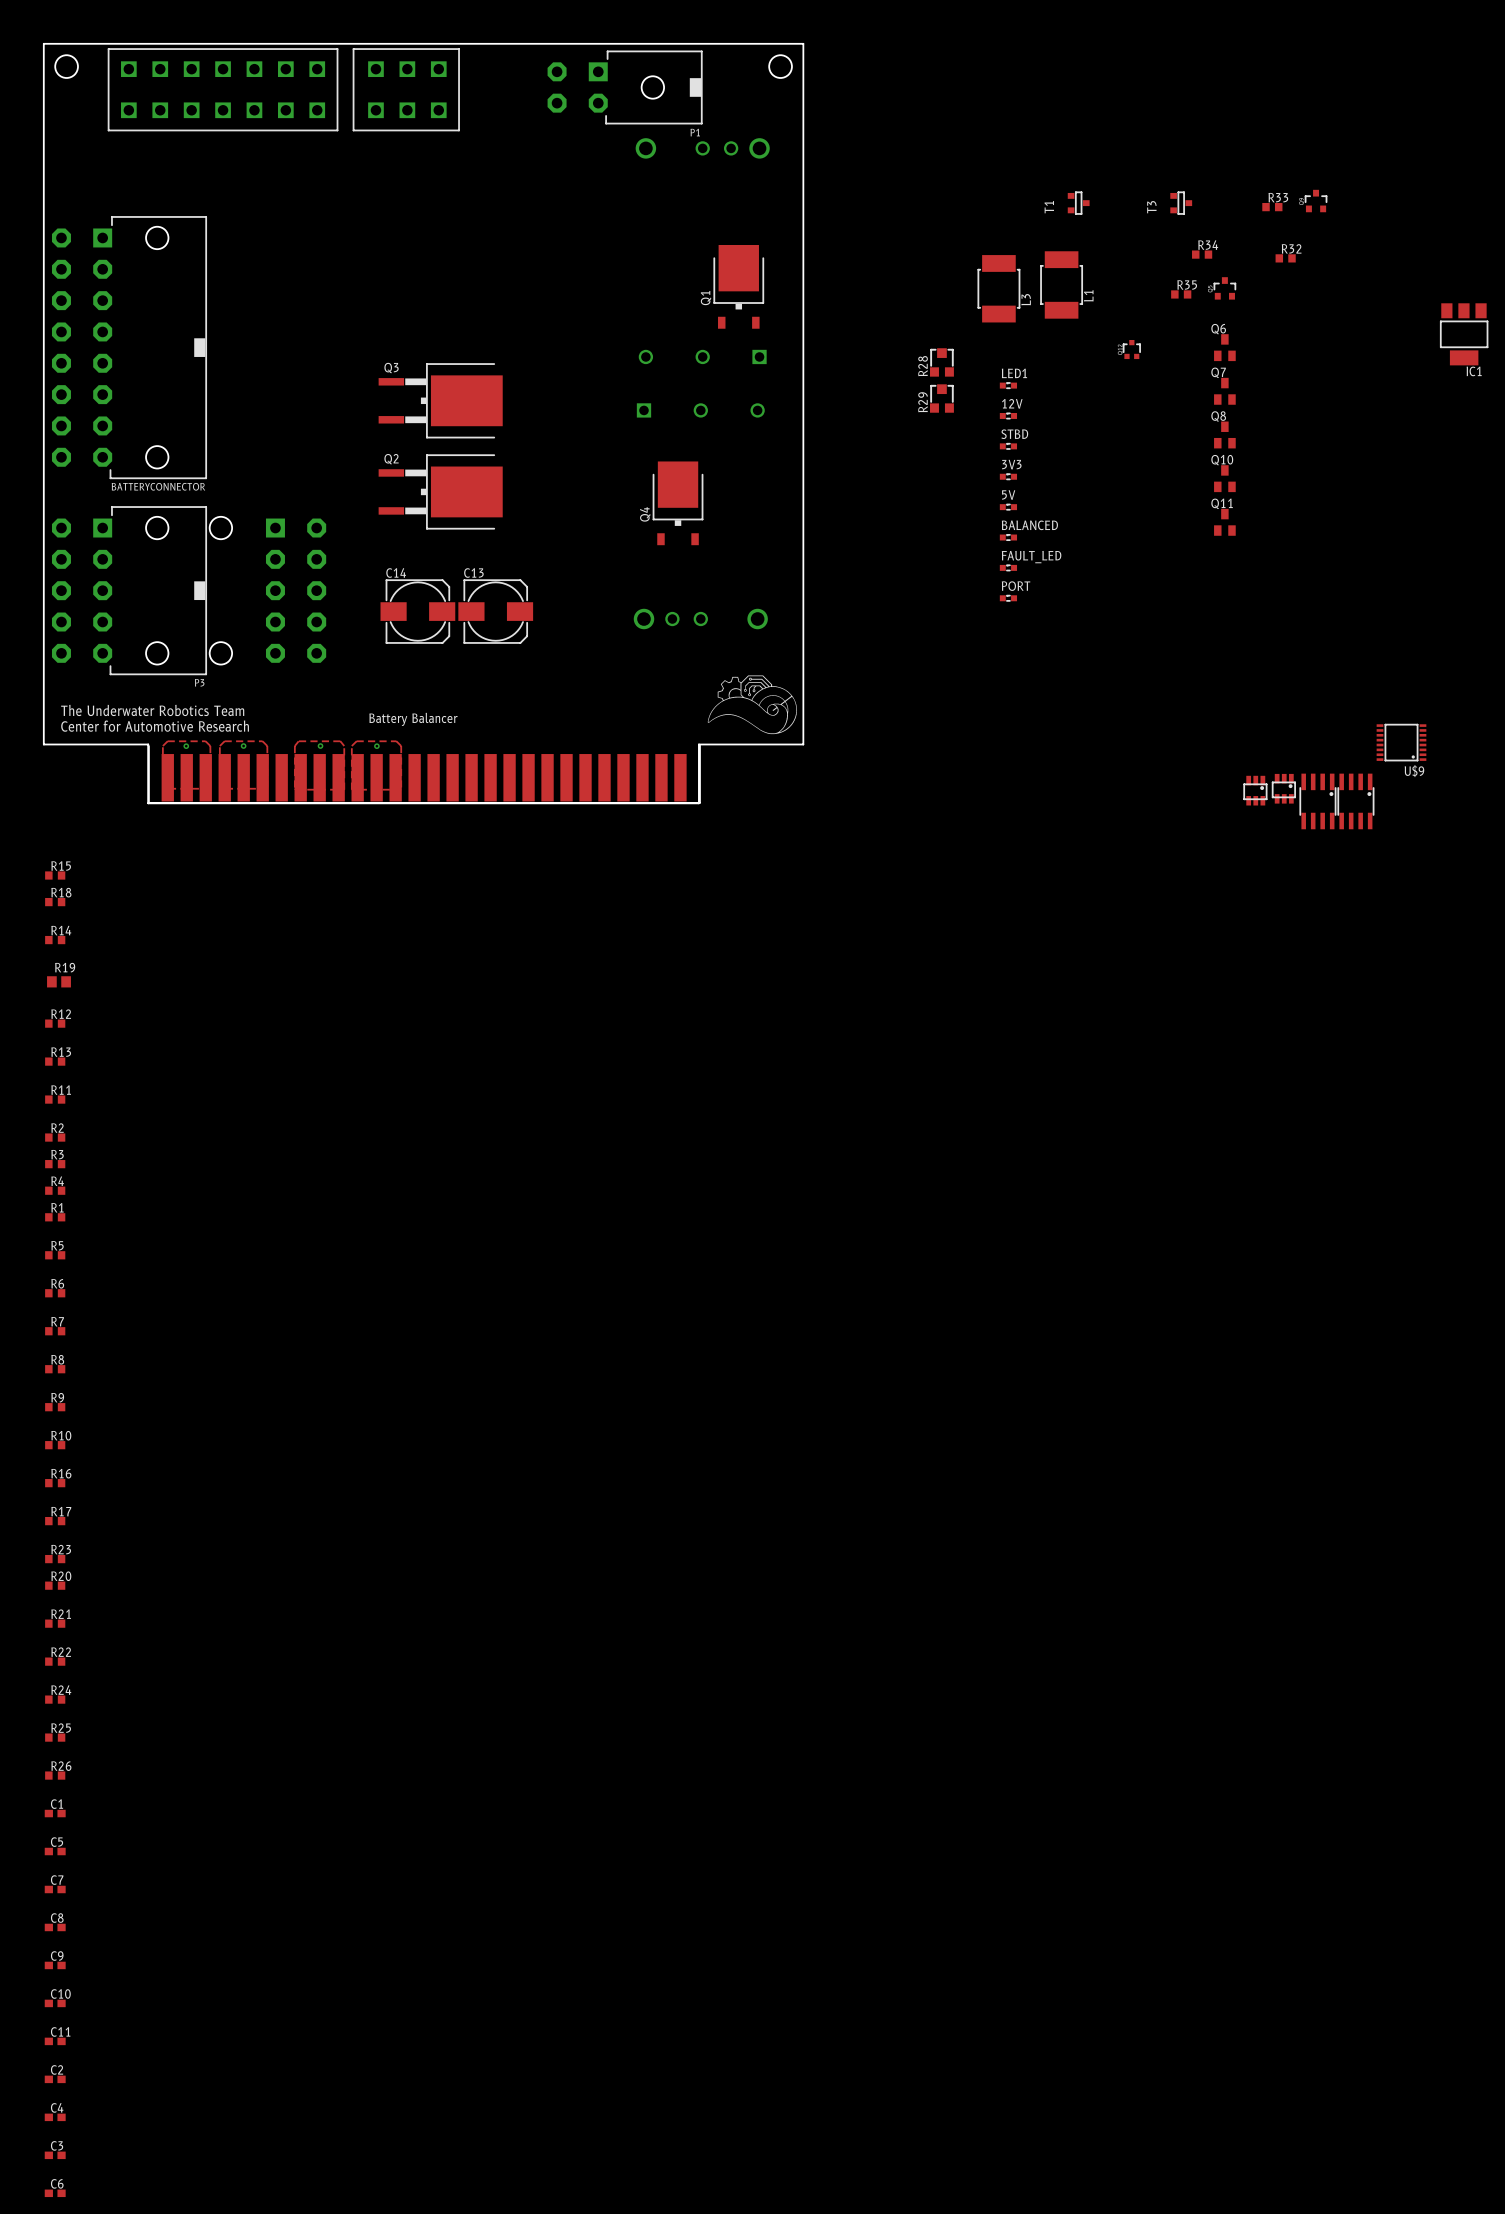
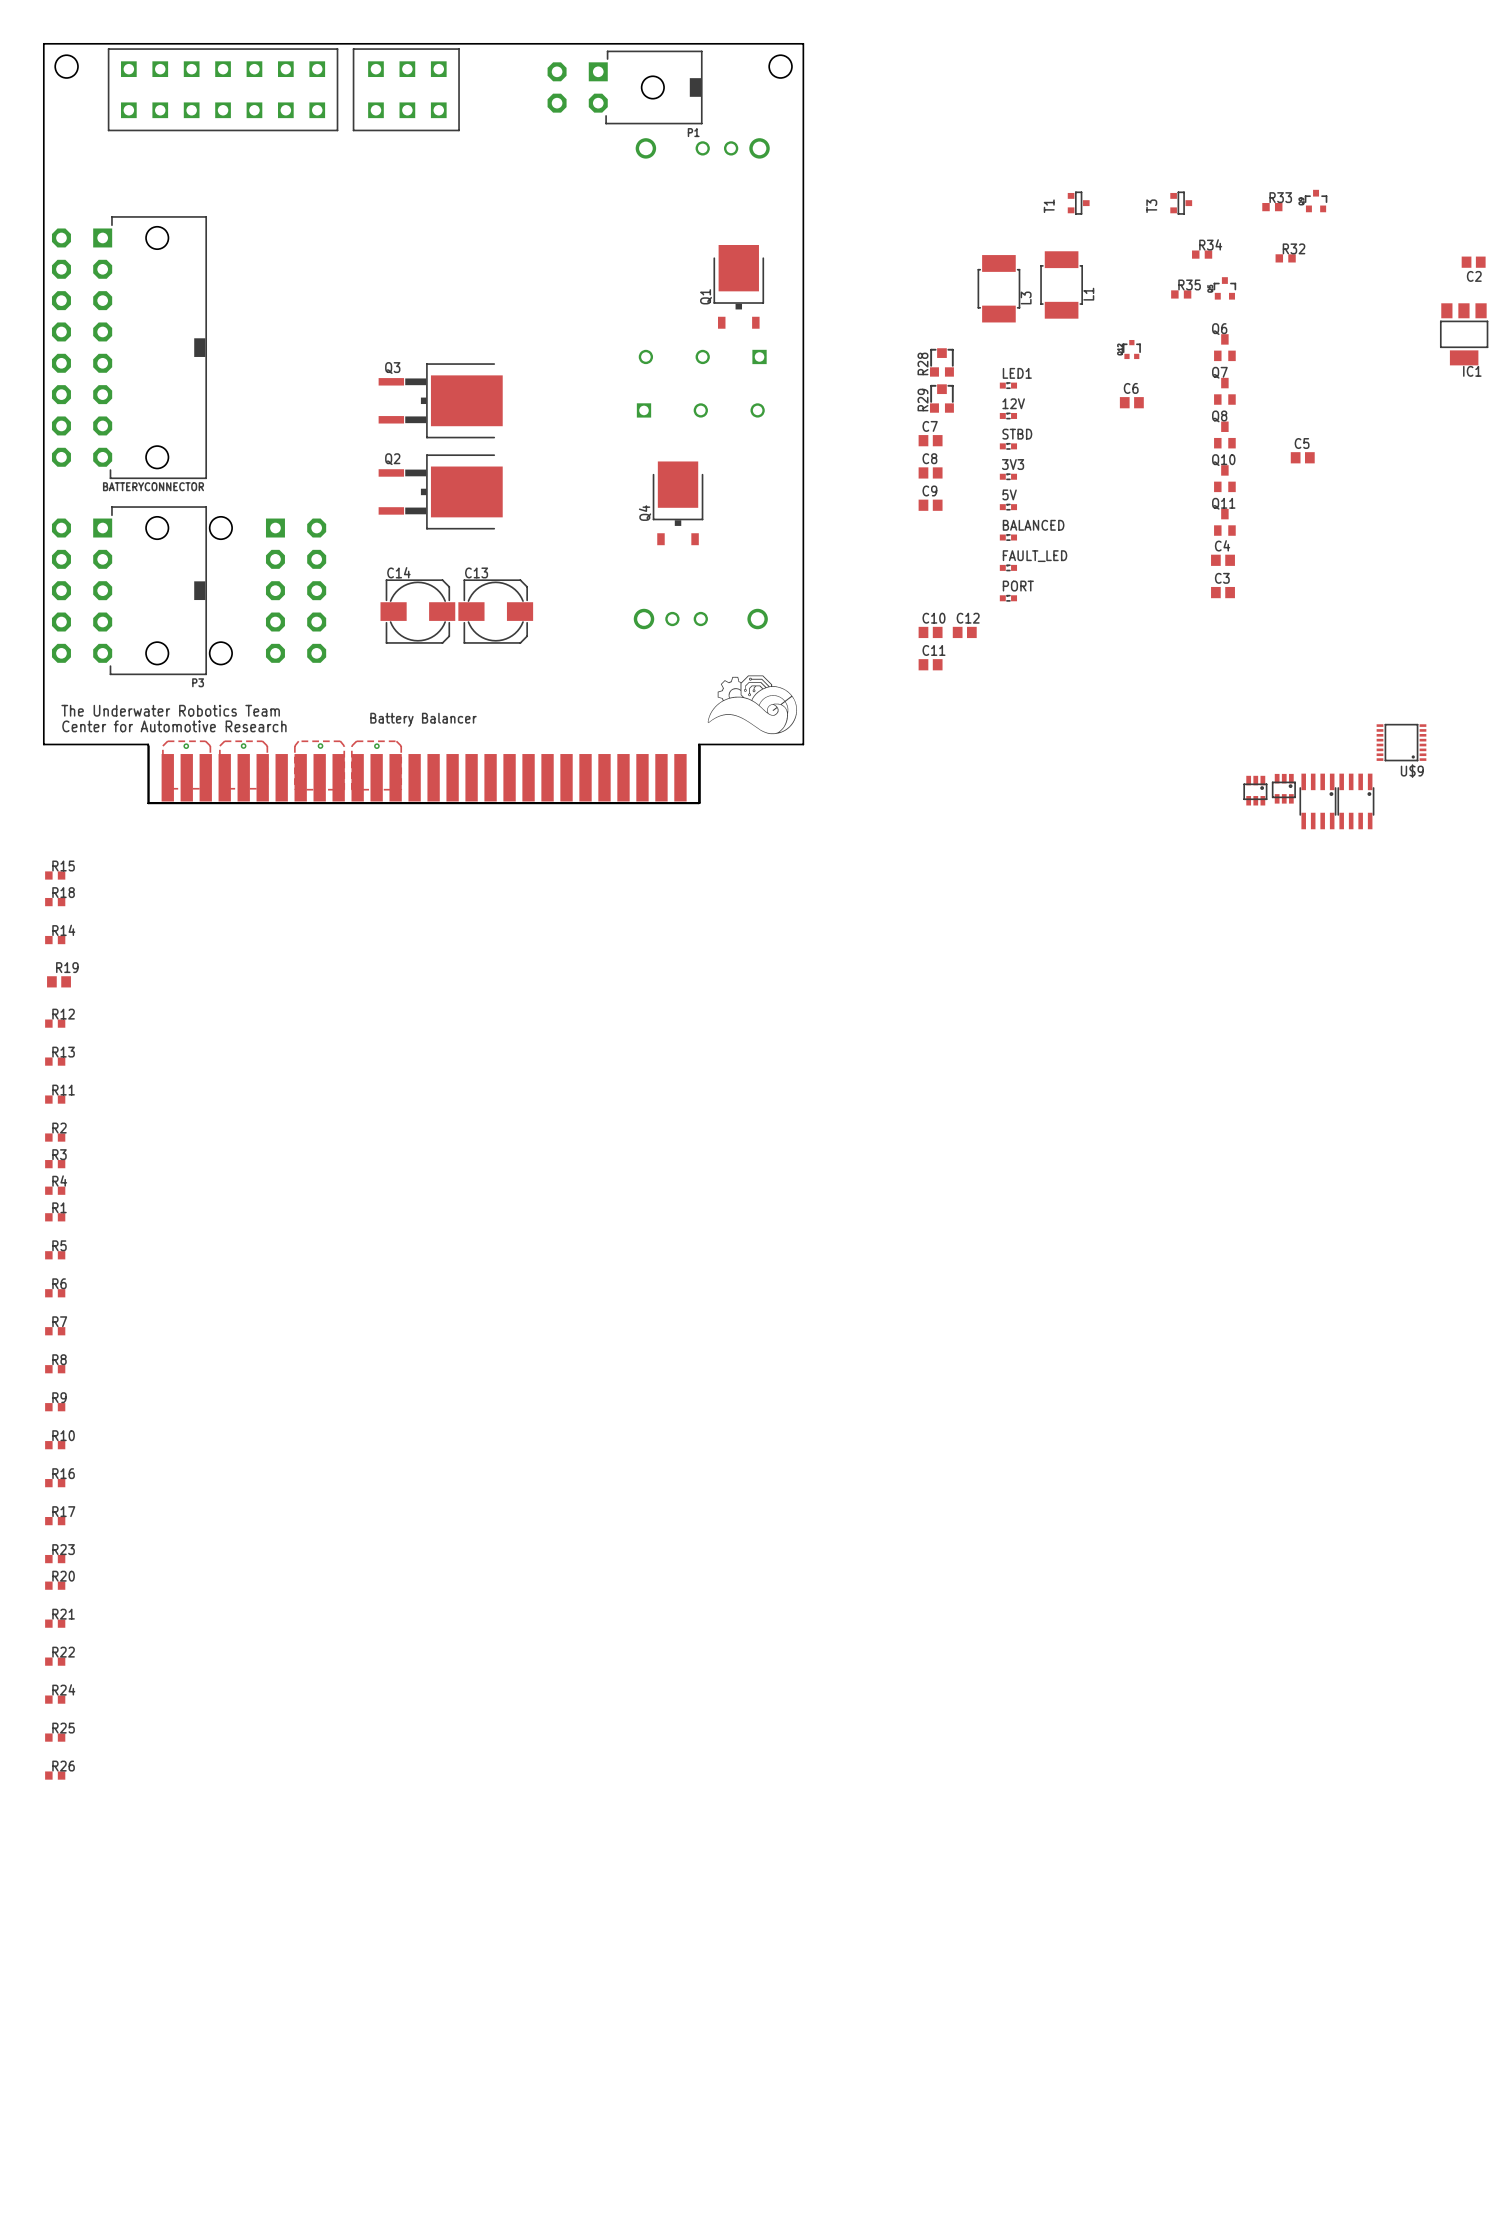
C12: none -> (964, 632)
C1: (55, 1813) -> none
C5 footprint: [44, 1847, 66, 1856] -> [1290, 452, 1315, 464]
C7 footprint: [44, 1885, 66, 1894] -> [918, 435, 943, 447]
C8 footprint: [44, 1923, 66, 1932] -> [918, 467, 943, 479]
C9 footprint: [44, 1961, 66, 1970] -> [918, 499, 943, 511]
C10 footprint: [44, 1999, 66, 2008] -> [918, 626, 943, 639]
C11 footprint: [44, 2037, 66, 2046] -> [918, 659, 943, 671]
C2 name position: C2 (57, 2069) -> C2 (1474, 276)
C2 footprint: [44, 2075, 66, 2084] -> [1461, 256, 1486, 268]
C4 footprint: [44, 2113, 66, 2122] -> [1211, 554, 1235, 566]
C3 footprint: [44, 2151, 66, 2160] -> [1211, 586, 1235, 599]
C6 footprint: [44, 2189, 66, 2198] -> [1119, 397, 1144, 409]

